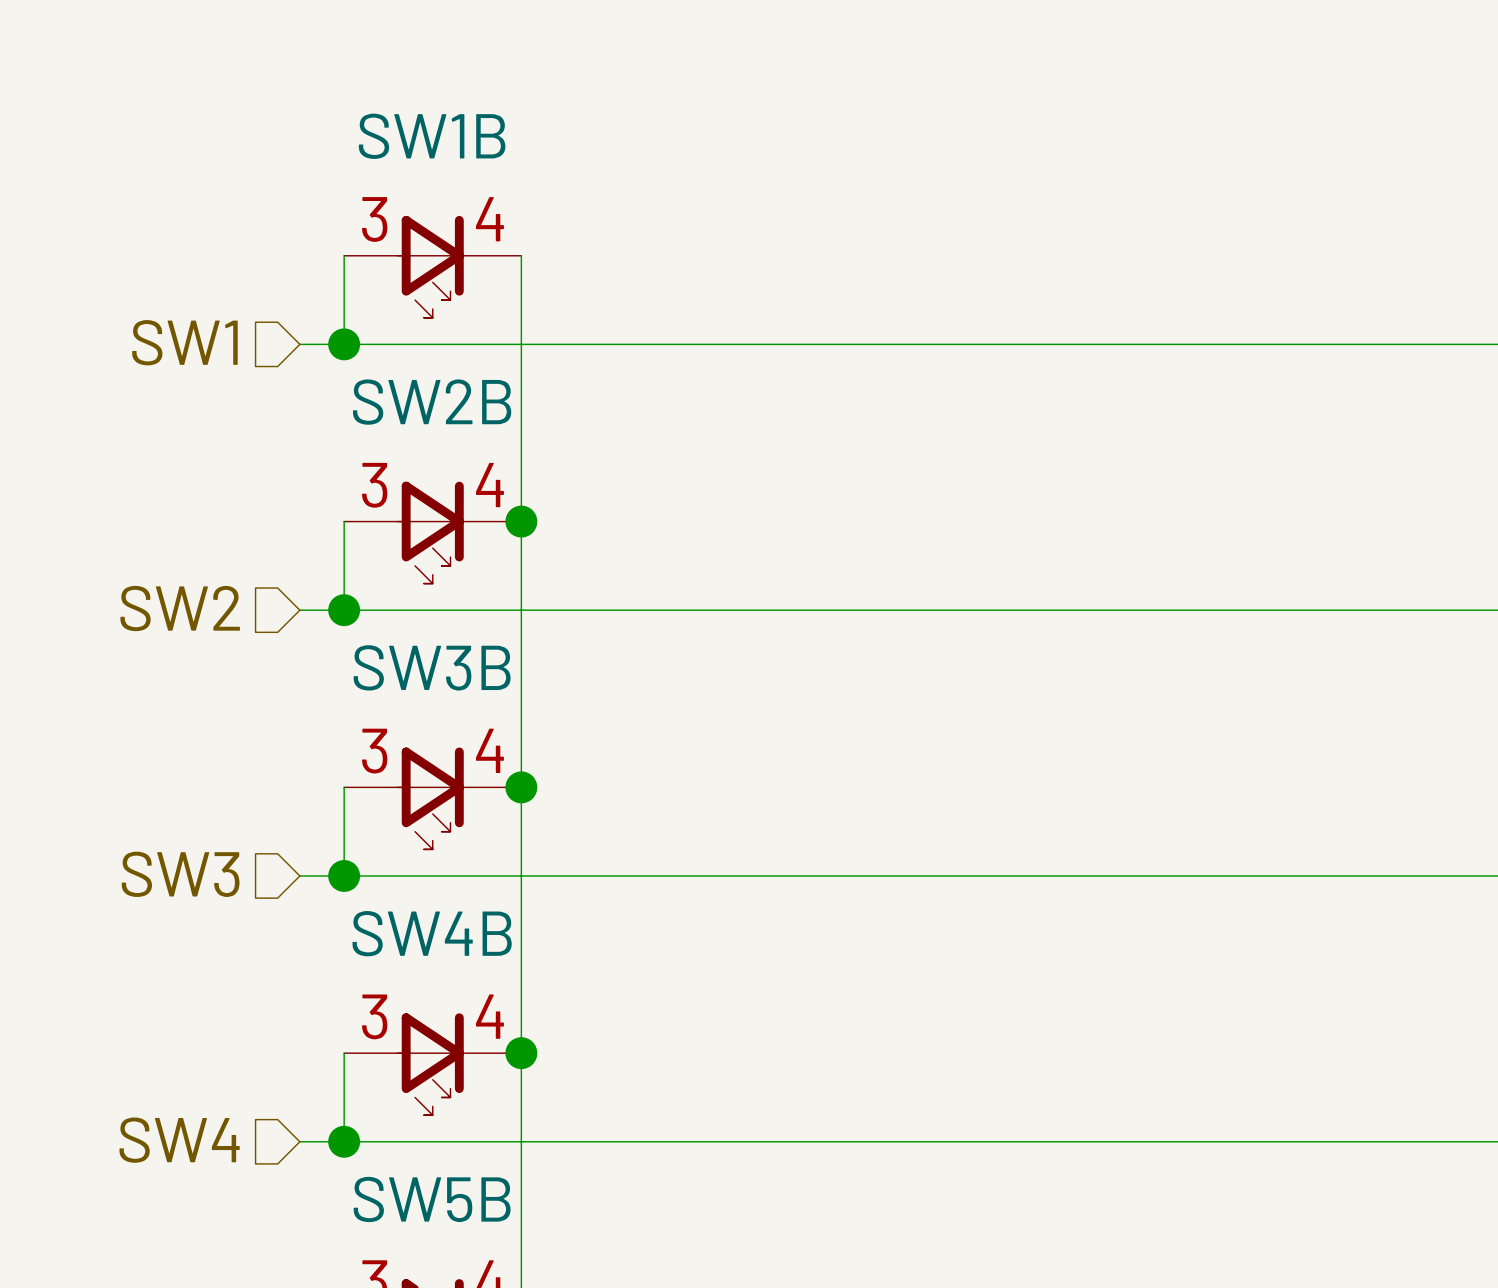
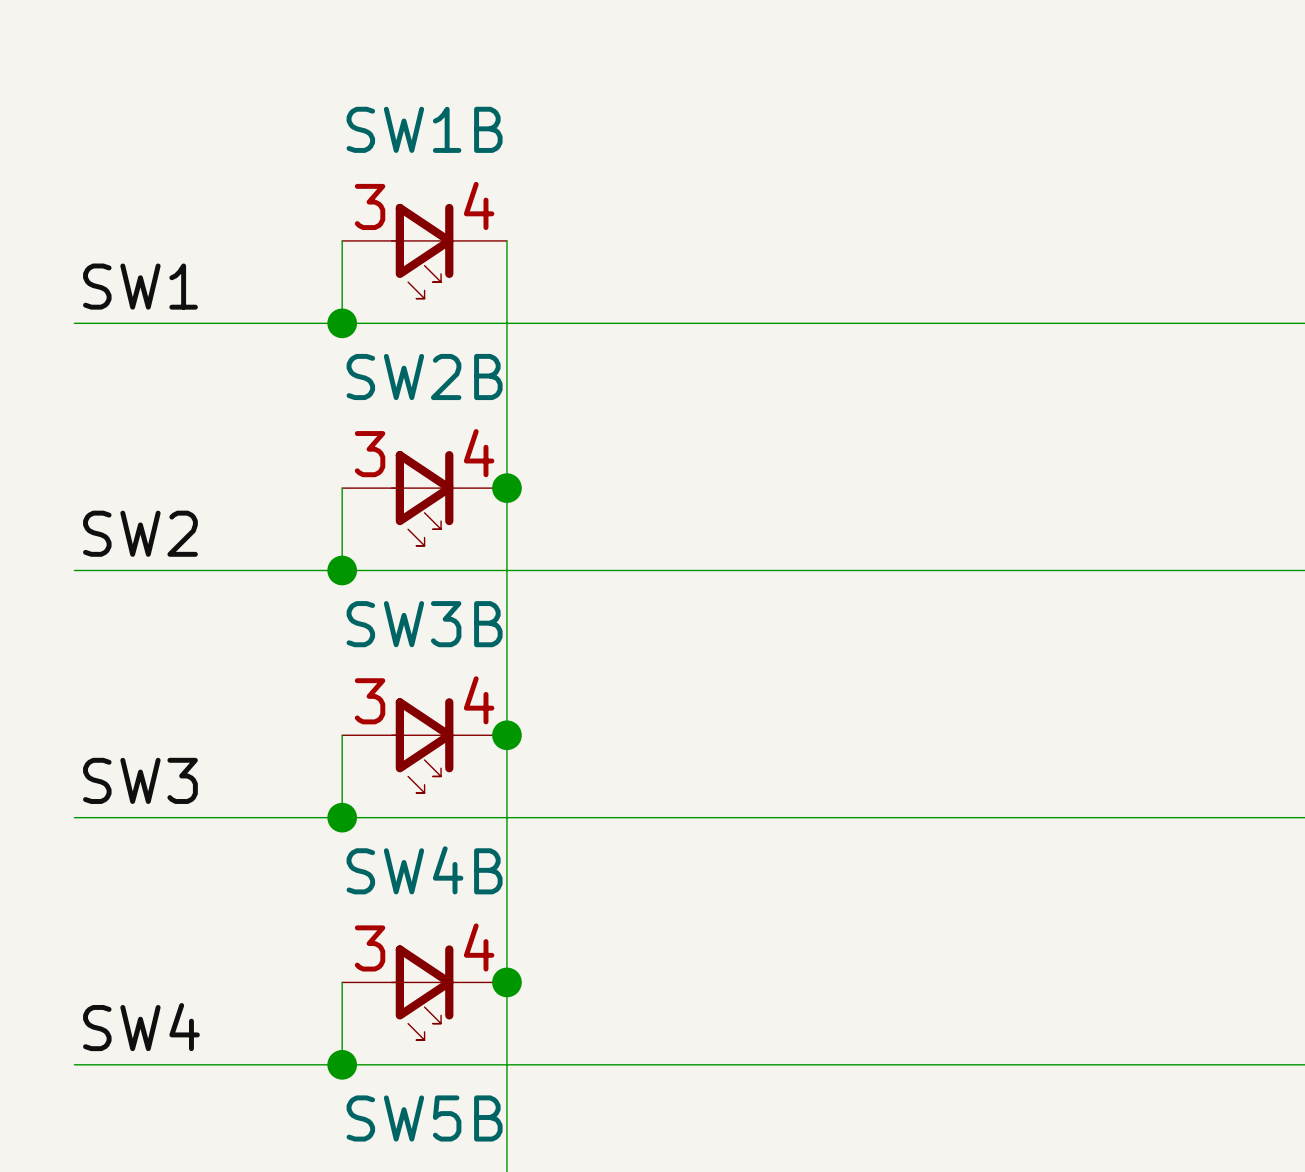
label: none -> SW1 (140, 286)
hierarchical label: SW1 (184, 342) -> none
wire: none -> (74, 323) (301, 323)
label: none -> SW2 (140, 533)
hierarchical label: SW2 (180, 608) -> none
wire: none -> (74, 570) (301, 570)
label: none -> SW3 (140, 780)
hierarchical label: SW3 (180, 874) -> none
wire: none -> (74, 817) (301, 817)
label: none -> SW4 (141, 1027)
hierarchical label: SW4 (179, 1140) -> none
wire: none -> (74, 1064) (301, 1064)

